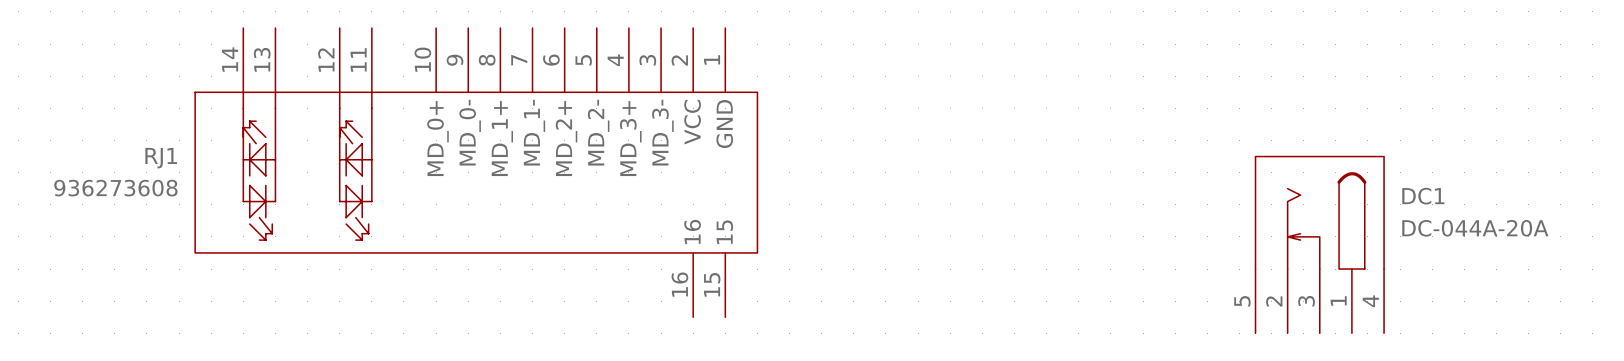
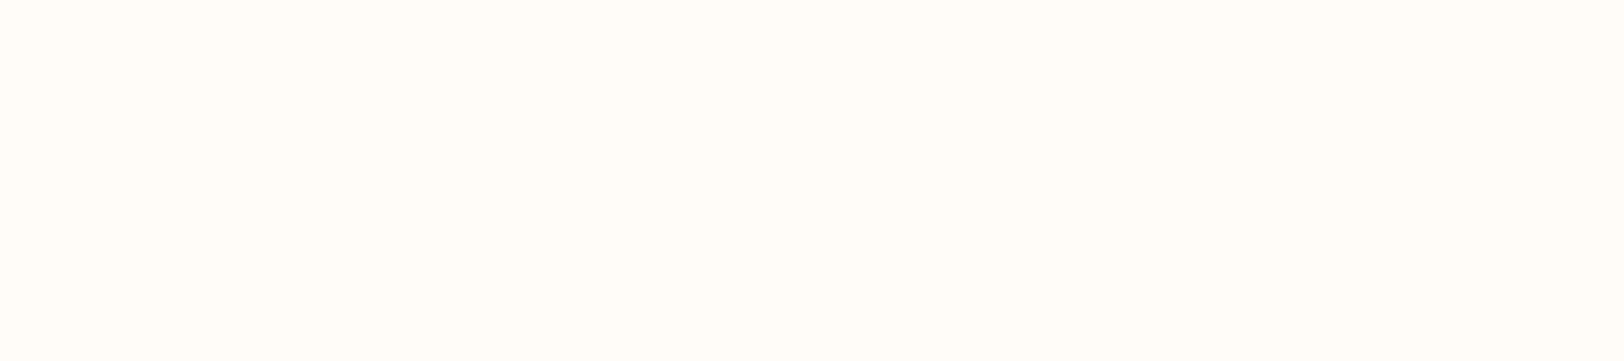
RJ1: 936273608 (476, 172) -> none
DC1: DC-044A-20A (1319, 244) -> none

